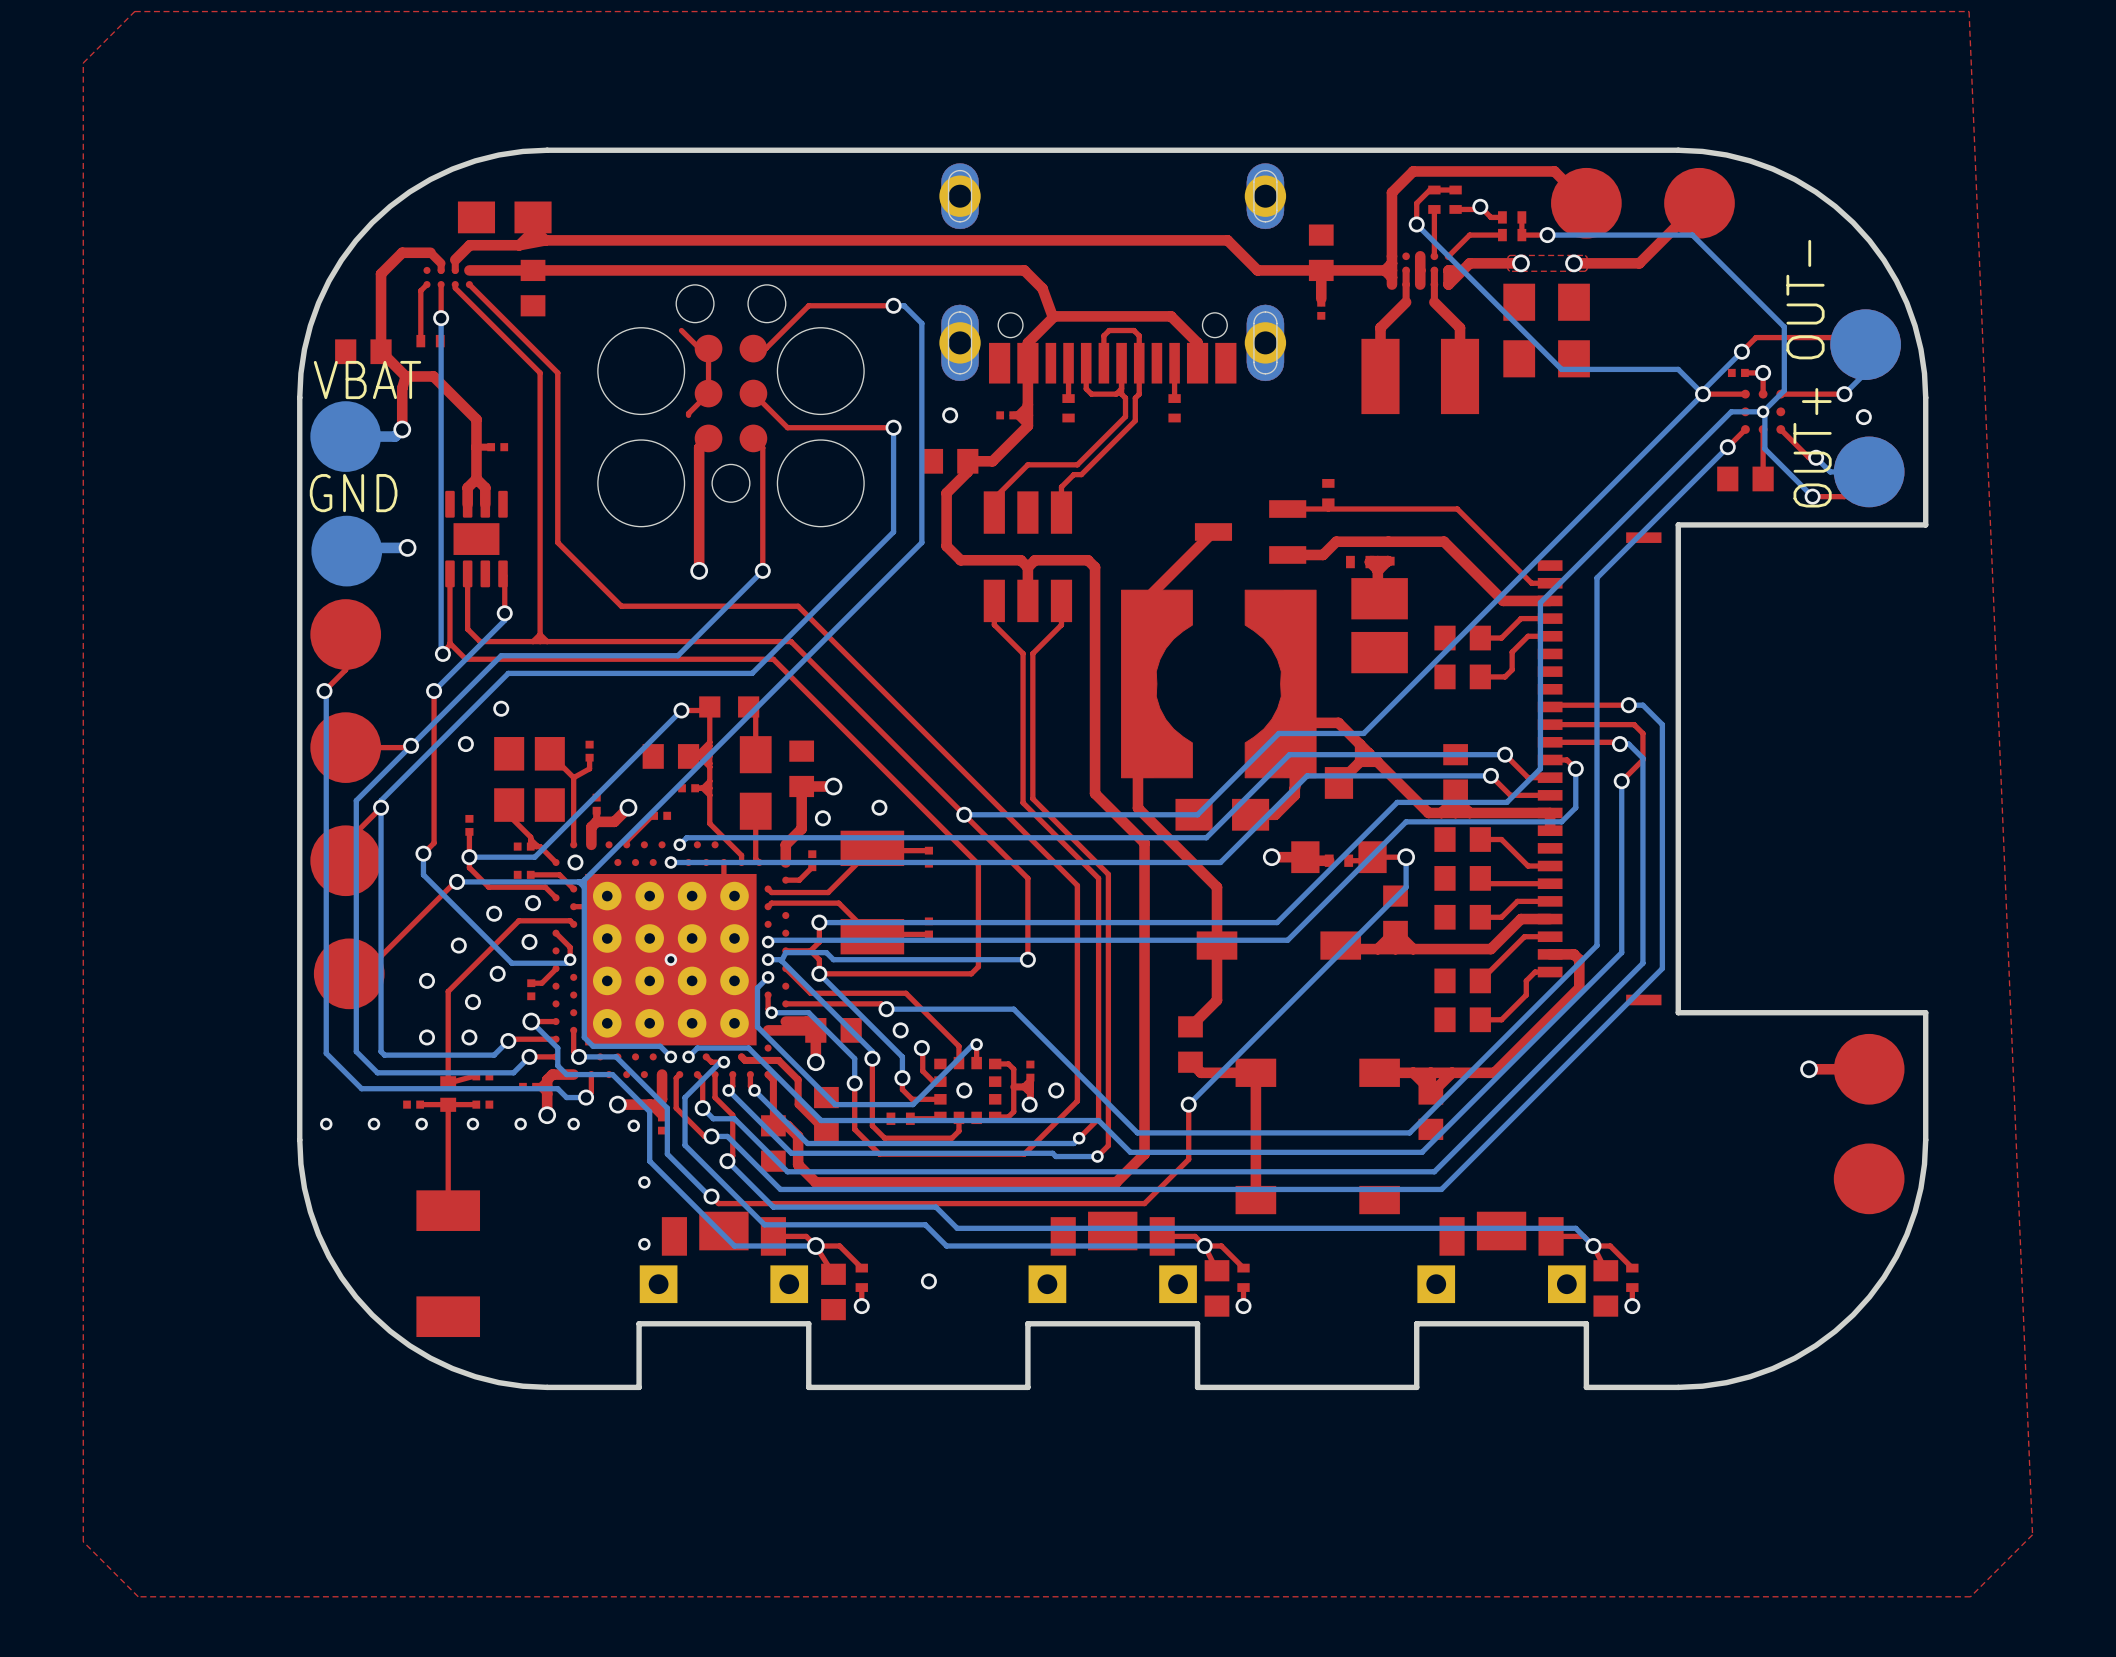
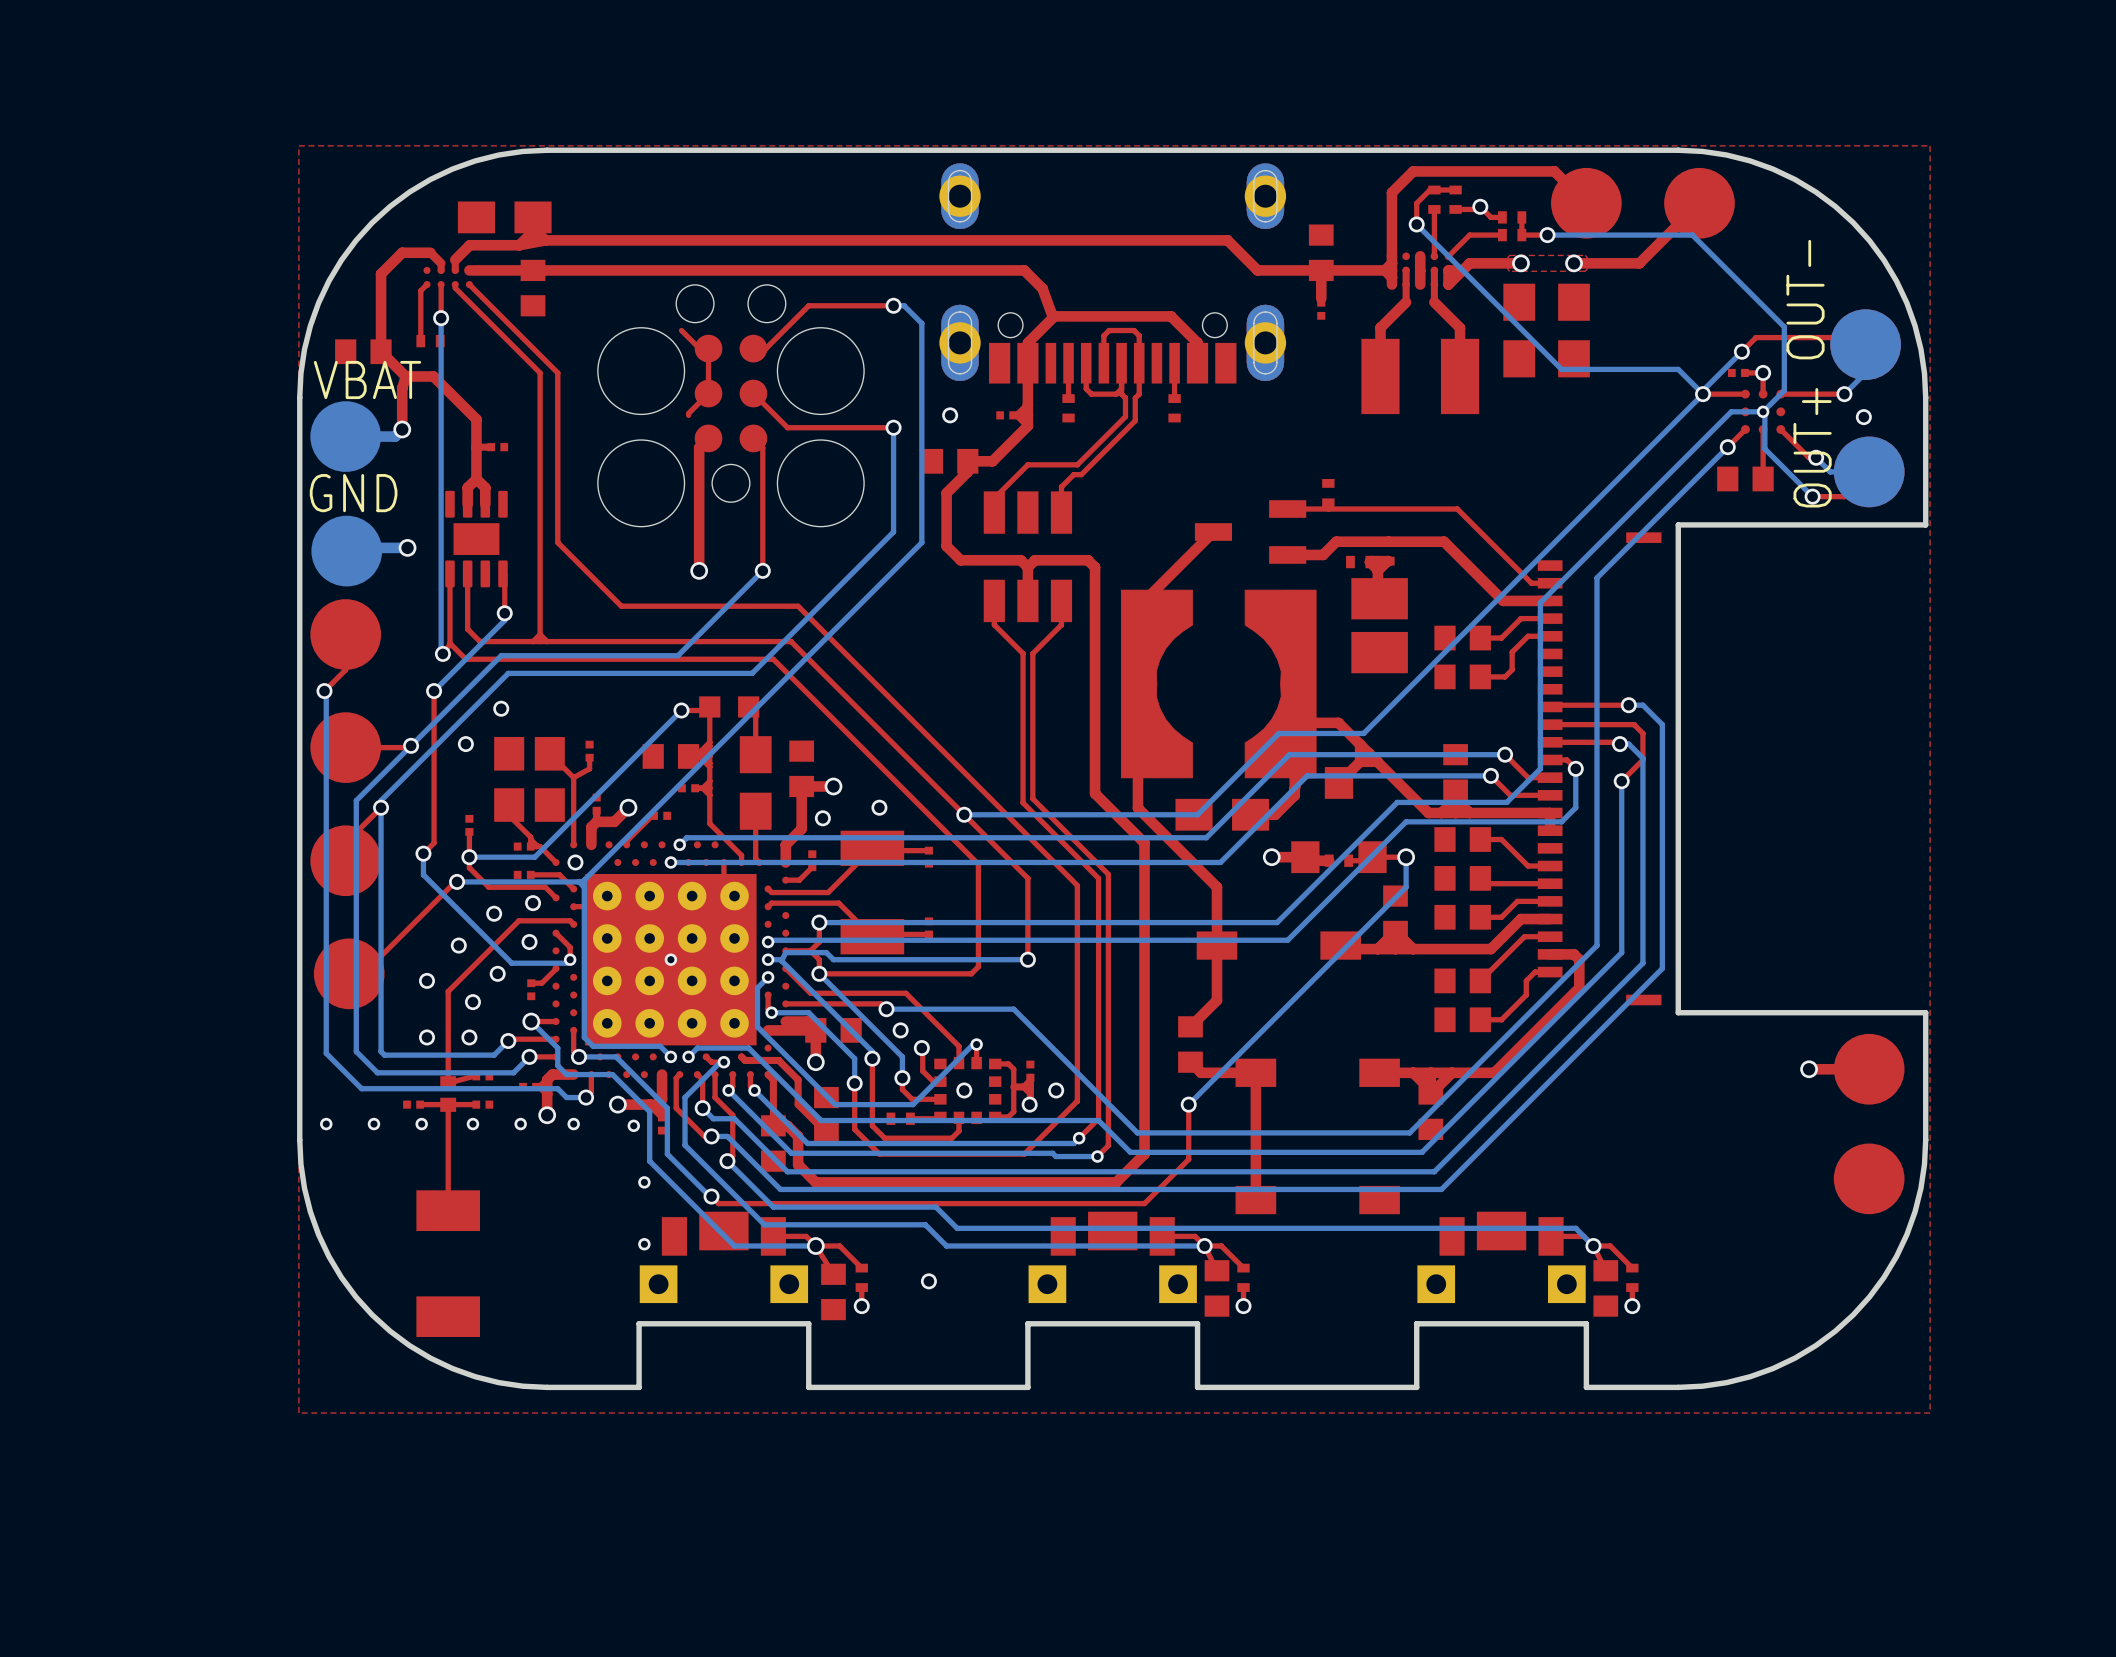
top zone outline: (1969, 11) (134, 11) (83, 62) (83, 1541) (138, 1596) (1970, 1596) (2032, 1534) (1969, 11) -> (1930, 145) (1930, 1412) (298, 1412) (298, 145) (1930, 145)

